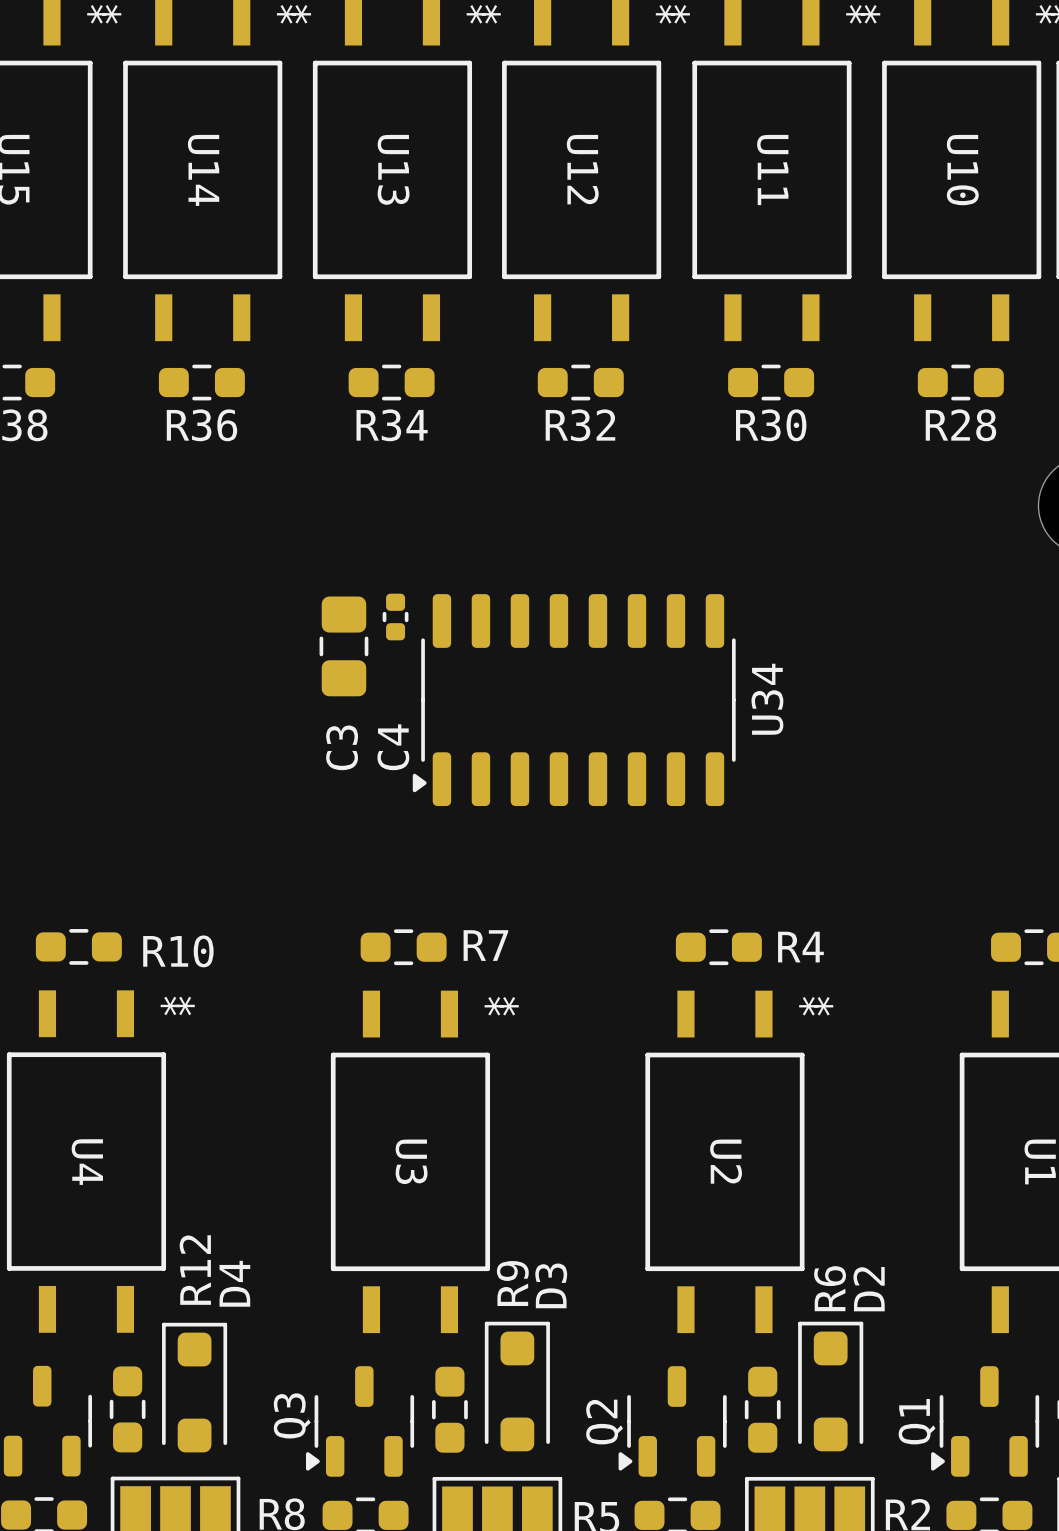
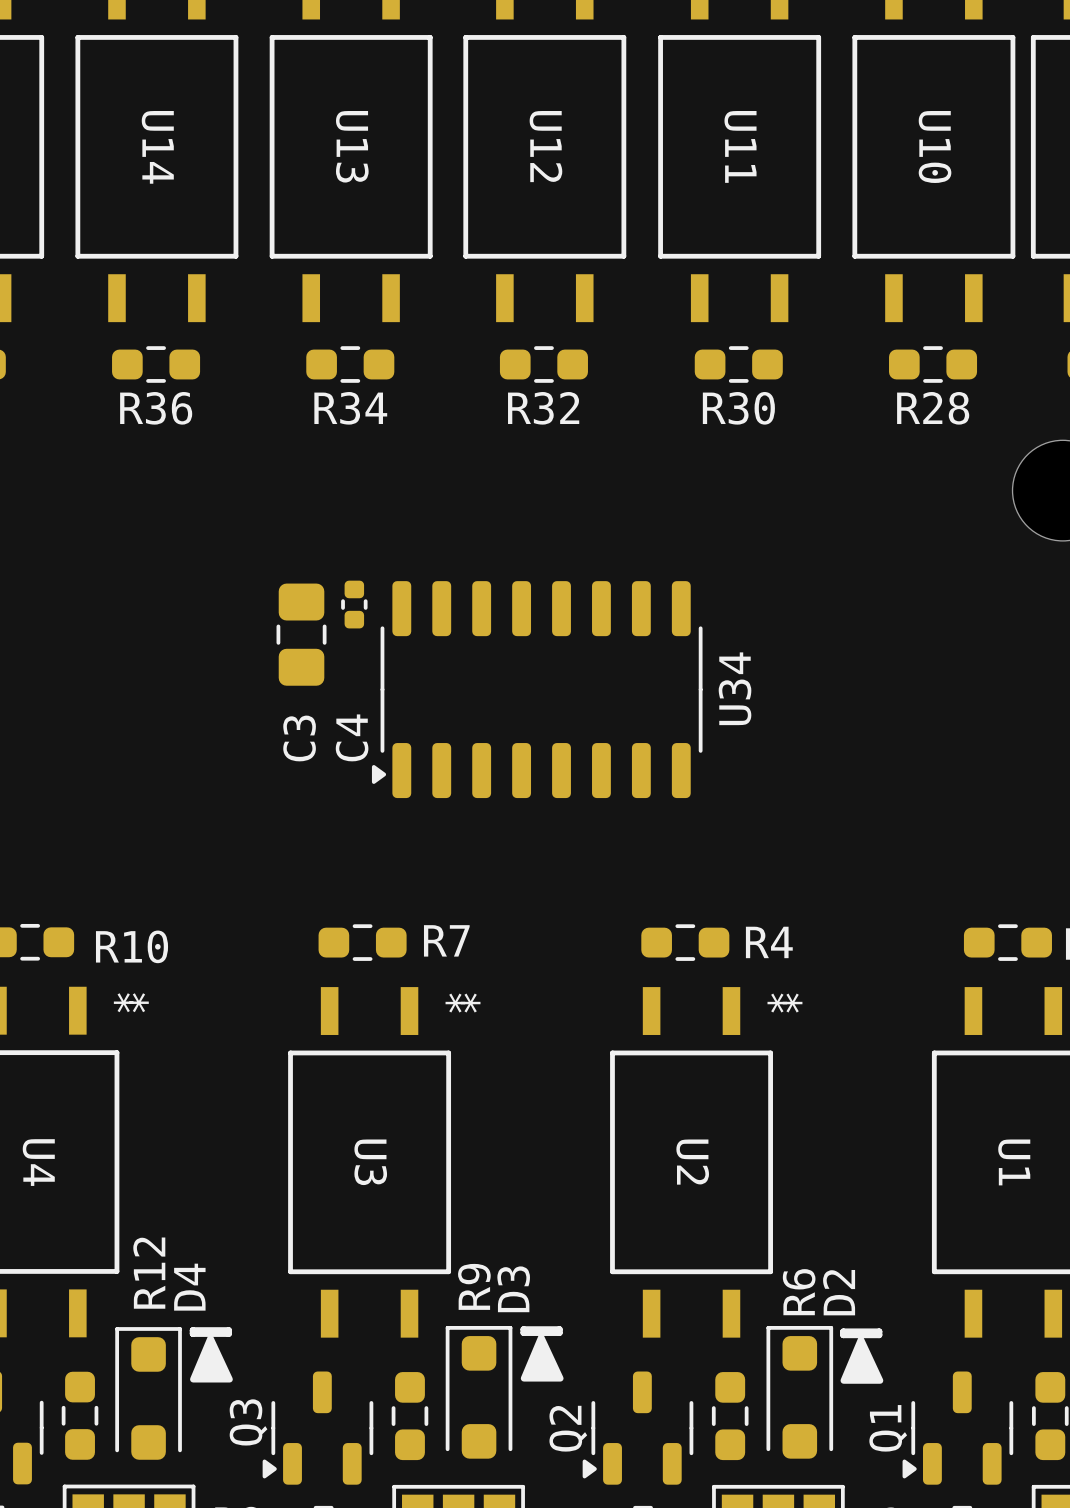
line: none -> (192, 1330) (228, 1330) (228, 1333) (192, 1333) (192, 1330)
line: none -> (523, 1329) (559, 1329) (559, 1332) (523, 1332) (523, 1329)
line: none -> (843, 1331) (879, 1331) (879, 1335) (843, 1335) (843, 1331)
drawing: none -> [520, 1334, 564, 1382]
drawing: none -> [190, 1335, 233, 1383]
drawing: none -> [840, 1336, 884, 1384]

